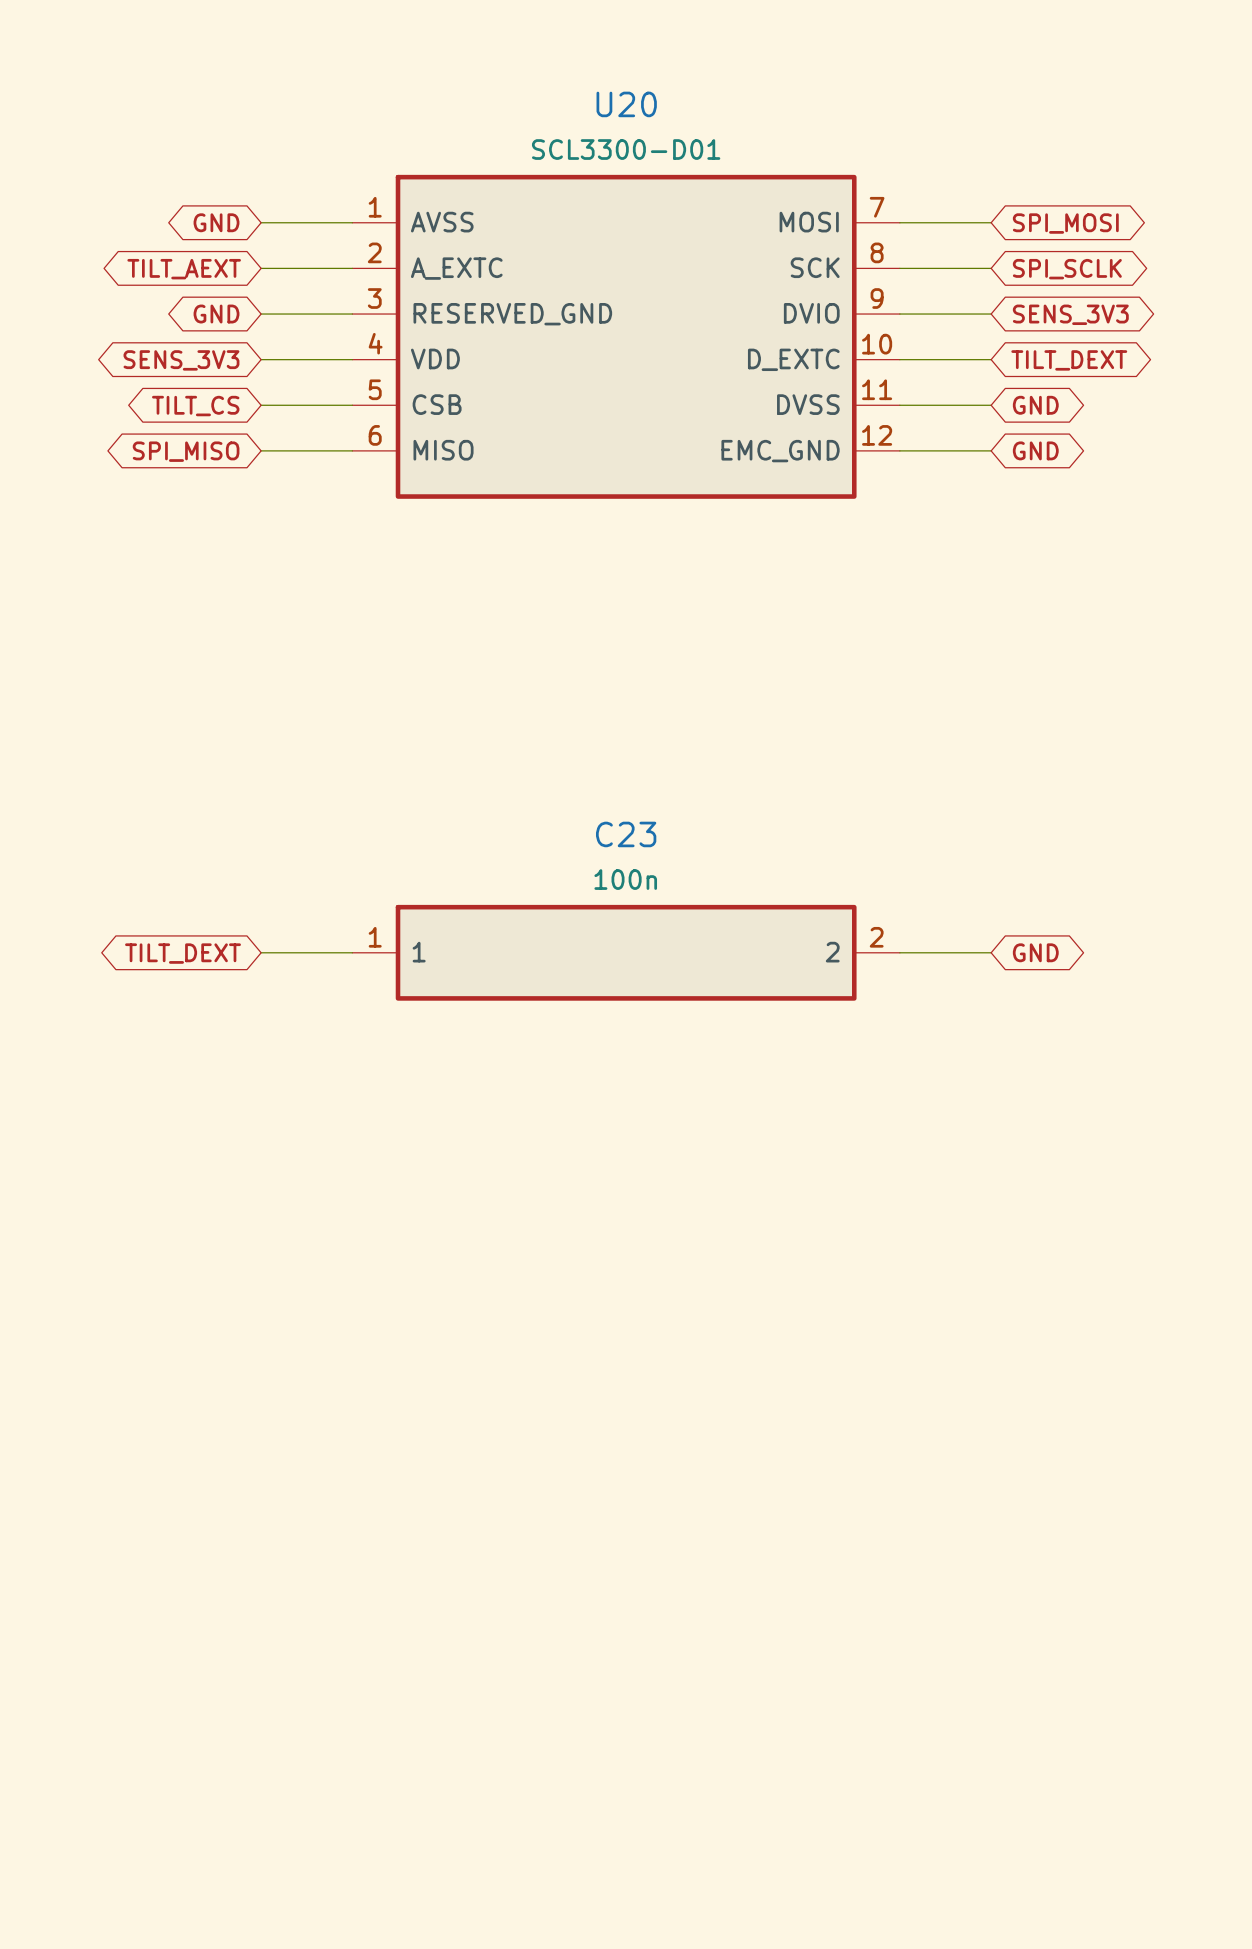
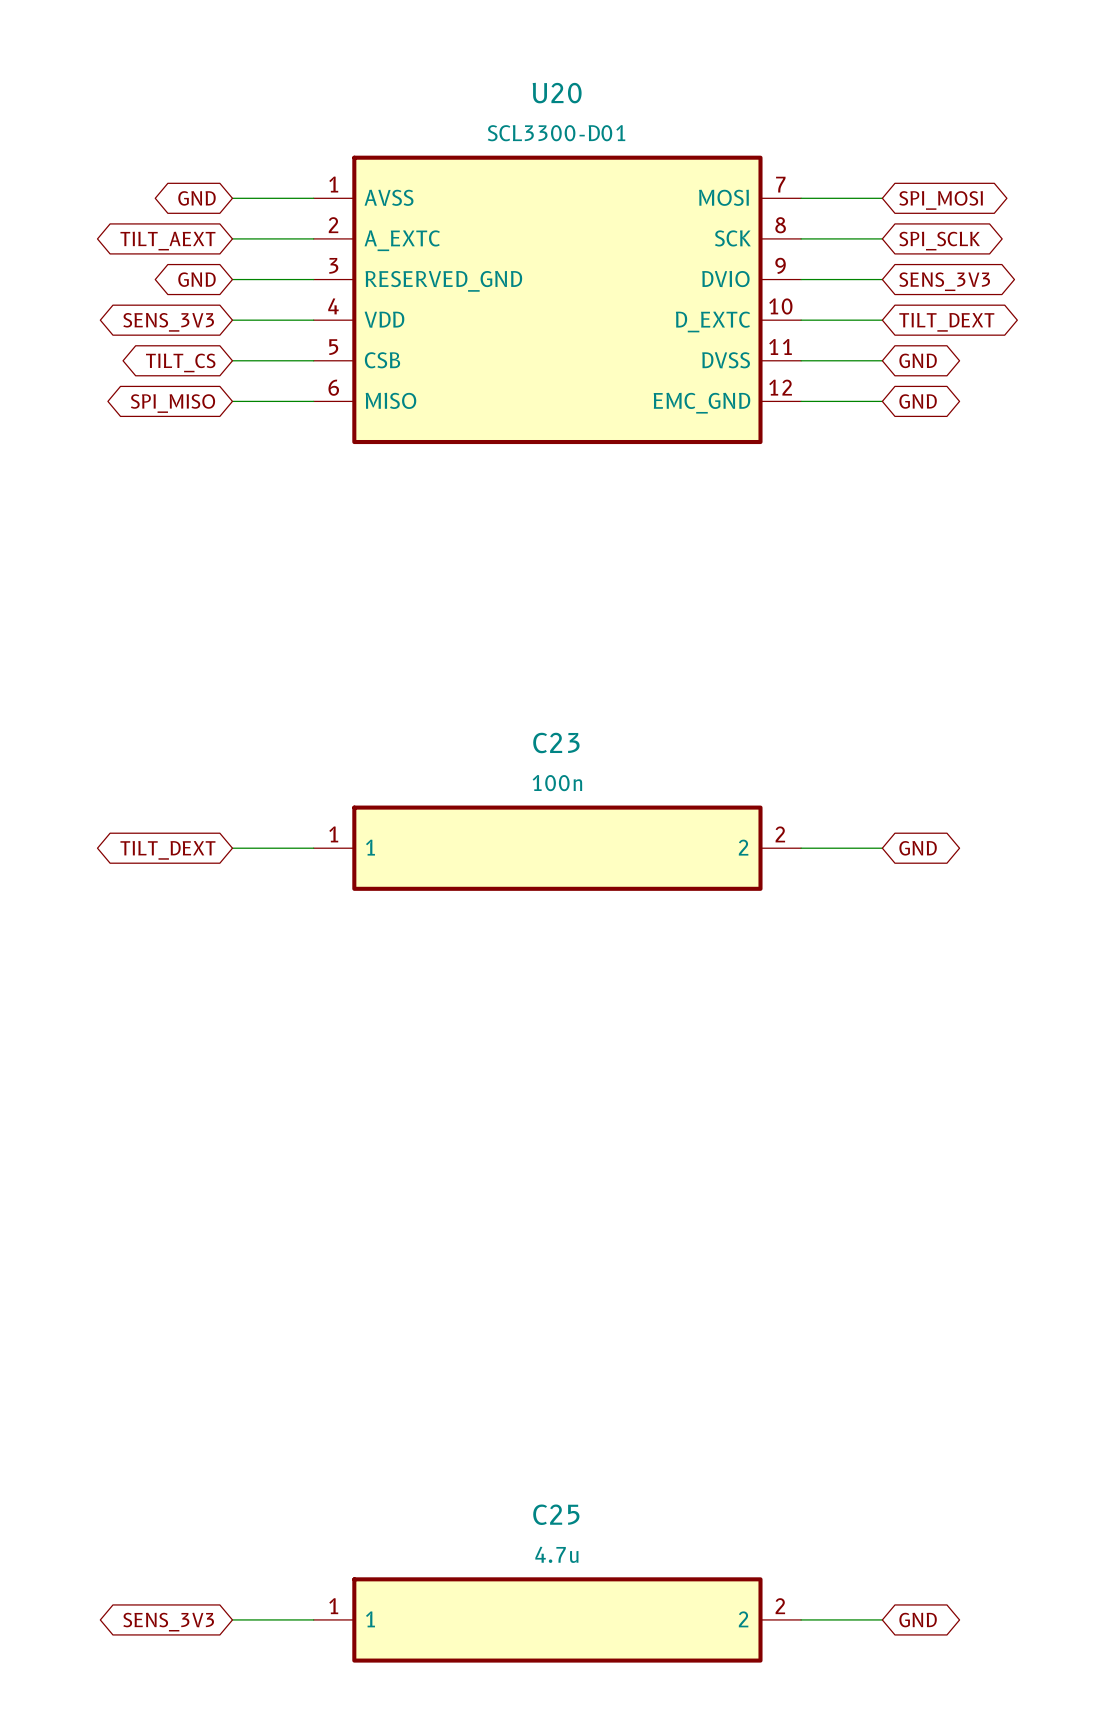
wire: none -> (232, 1619) (313, 1619)
C25: none -> 4.7u (557, 1619)
wire: none -> (801, 1619) (882, 1619)
global label: none -> GND (918, 1620)
global label: none -> SENS_3V3 (168, 1622)

